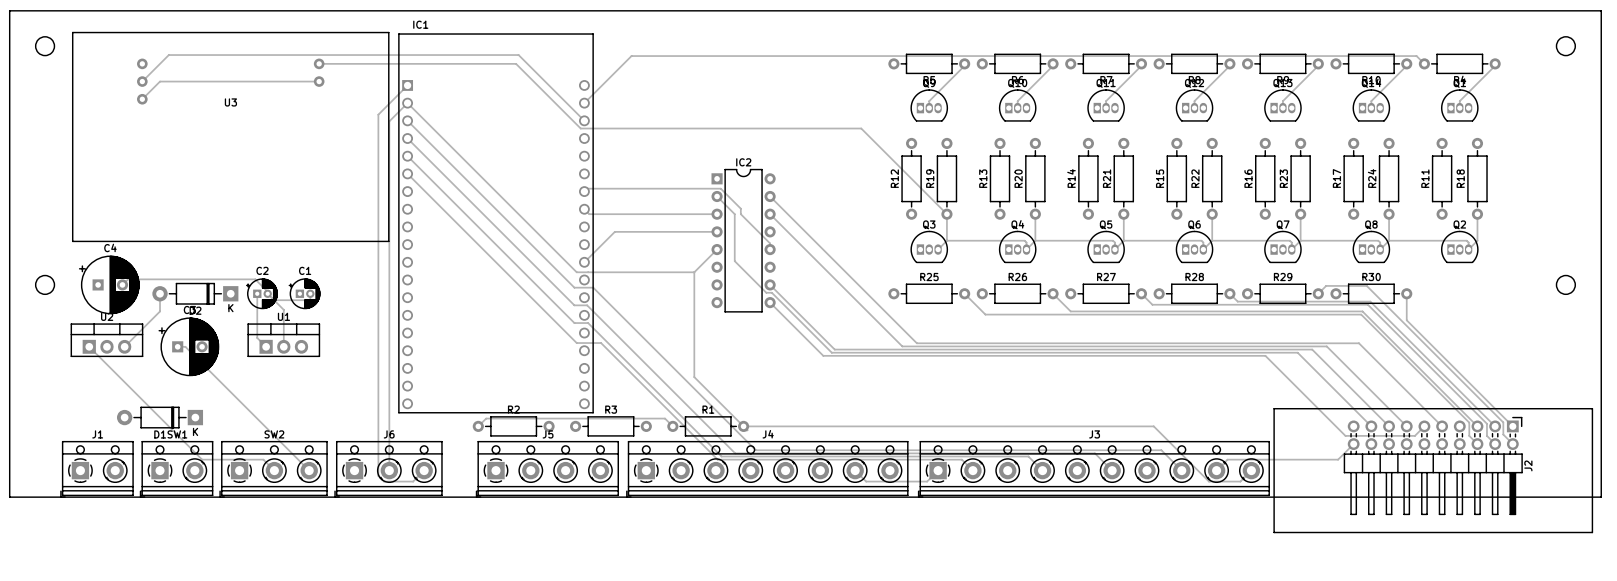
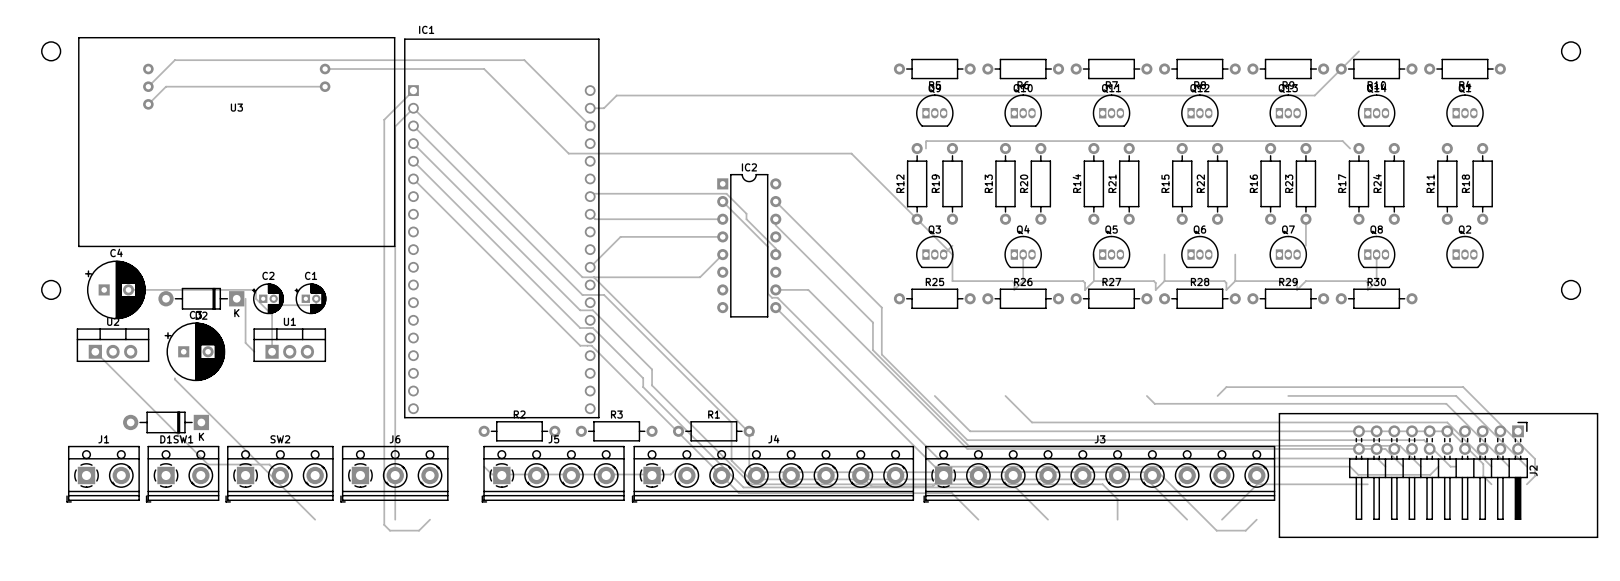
board edge: (9, 10) (9, 497) (1601, 497) (1601, 10) (9, 10) -> none
track: (478, 63) (516, 63) (580, 128) (861, 128) (946, 214) (946, 240) (1024, 240) (1026, 249) (1035, 240) -> (484, 69) (568, 153) (851, 153) (952, 254) (952, 281) (1012, 281) (1014, 289) (1023, 281)
track: (964, 63) (929, 101) (929, 108) -> none
track: (1053, 63) (1017, 101) (1017, 108) -> none
track: (1141, 63) (1106, 101) (1106, 108) -> none
track: (1229, 63) (1194, 101) (1194, 108) -> none
track: (1318, 63) (1282, 101) (1282, 108) -> none
track: (1406, 63) (1371, 101) (1371, 108) -> none
track: (1424, 63) (1416, 56) (631, 56) (584, 103) -> (1358, 51) (1314, 95) (616, 95) (603, 108) (590, 108)
track: (1495, 63) (1459, 101) (1459, 108) -> none
track: none -> (925, 148) (926, 141) (1342, 141) (1350, 148)
track: (734, 214) (734, 261) (762, 288) -> (740, 219) (767, 246) (767, 293)
track: (770, 214) (902, 346) (1326, 346) (1406, 426) -> (775, 219) (775, 225) (872, 322) (872, 350) (968, 445) (1400, 445) (1420, 466)
track: (1035, 214) (1035, 240) -> (1023, 254) (1023, 281)
track: (1123, 214) (1123, 240) -> (1164, 254) (1164, 281)
track: (1212, 214) (1212, 240) -> (1235, 254) (1235, 281)
track: (1389, 214) (1389, 240) -> none
track: (1477, 214) (1477, 240) (1468, 249) (1466, 240) (1389, 240) -> none
track: (1035, 240) (1113, 240) (1114, 249) (1123, 240) -> none
track: (1123, 240) (1201, 240) (1203, 249) (1212, 240) -> none
track: (1212, 240) (1289, 240) (1291, 249) (1300, 240) (1378, 240) (1380, 249) (1389, 240) -> none
track: none -> (1093, 254) (1093, 281)
track: none -> (1376, 254) (1376, 281) (1367, 289) (1365, 281) (1305, 281) (1297, 289) (1295, 281) (1235, 281)
track: none -> (593, 277) (749, 432) (749, 466) (754, 472) (1158, 472) (1216, 530) (1245, 530) (1256, 519)
track: (694, 272) (694, 377) (743, 426) (964, 426) -> (934, 395) (970, 431)
track: none -> (1023, 281) (1083, 281) (1085, 289) (1093, 281)
track: none -> (1093, 281) (1153, 281) (1155, 289) (1164, 281)
track: none -> (1164, 281) (1224, 281) (1226, 289) (1235, 281)
track: (122, 284) (128, 279) (255, 279) (283, 309) (283, 346) -> (128, 289) (253, 289) (256, 292) (256, 298) (272, 314) (272, 351)
track: (770, 284) (834, 349) (1312, 349) (1389, 426) -> (775, 289) (808, 289) (967, 448) (1385, 448) (1403, 466)
track: (574, 287) (593, 287) (755, 450) (1161, 450) (1181, 470) -> (580, 292) (582, 294) (604, 294) (731, 422) (731, 460) (750, 479) (1146, 479) (1187, 519)
track: (160, 293) (160, 311) (124, 346) -> none
track: (257, 293) (257, 337) (266, 346) -> (245, 298) (245, 342) (254, 351)
track: (964, 293) (985, 314) (1361, 314) (1469, 422) (1469, 435) (1477, 444) -> none
track: (1053, 293) (1070, 311) (1362, 311) (1477, 426) -> none
track: (1141, 293) (1152, 304) (1367, 304) (1486, 423) (1486, 435) (1495, 444) -> none
track: (1229, 293) (1237, 301) (1370, 301) (1495, 426) -> none
track: (1318, 293) (1326, 285) (1366, 285) (1503, 422) (1503, 434) (1512, 444) -> none
track: (1406, 293) (1406, 320) (1512, 426) -> none
track: (876, 302) (916, 343) (1359, 343) (1442, 426) -> (881, 307) (881, 354) (967, 440) (1424, 440) (1450, 466) (1456, 466)
track: (574, 323) (588, 323) (721, 456) (1028, 456) (1042, 470) -> (580, 328) (592, 328) (643, 378) (643, 387) (743, 487) (1015, 487) (1048, 519)
track: (574, 340) (576, 343) (601, 343) (717, 459) (961, 459) (972, 470) -> (580, 345) (591, 345) (739, 493) (951, 493) (978, 519)
track: (177, 346) (185, 346) (309, 470) -> none
track: (831, 352) (1297, 352) (1371, 426) -> (837, 357) (938, 458) (1377, 458) (1385, 466)
track: (823, 355) (1265, 355) (1345, 435) (1414, 435) (1424, 426) -> (828, 360) (934, 466) (1350, 466) (1358, 474) (1430, 474) (1438, 466)
track: (646, 364) (735, 453) (1094, 453) (1112, 470) -> (652, 369) (652, 385) (750, 484) (1102, 484) (1117, 499) (1117, 519)
track: none -> (174, 378) (315, 519)
track: none -> (1005, 395) (1032, 422) (1447, 422) (1491, 466)
track: none -> (1146, 395) (1154, 403) (1446, 403) (1509, 466)
track: none -> (1217, 395) (1226, 387) (1463, 387) (1535, 458) (1535, 476) (1526, 484)
track: none -> (1288, 395) (1456, 395) (1526, 466)
track: (478, 426) (486, 418) (665, 418) (672, 426) -> none
track: (1153, 426) (1208, 481) (1240, 481) (1251, 470) -> (1159, 431) (1450, 431) (1483, 464) (1483, 476) (1491, 484)
track: (1353, 444) (1338, 459) (1227, 459) (1216, 470) -> none
track: none -> (484, 466) (491, 474) (670, 474) (678, 466)
track: none -> (395, 475) (395, 519)
track: (424, 470) (413, 481) (384, 481) (378, 475) -> (430, 519) (419, 530) (389, 530) (384, 524) (384, 480)
track: none -> (1367, 484) (1257, 484) (1221, 519)

